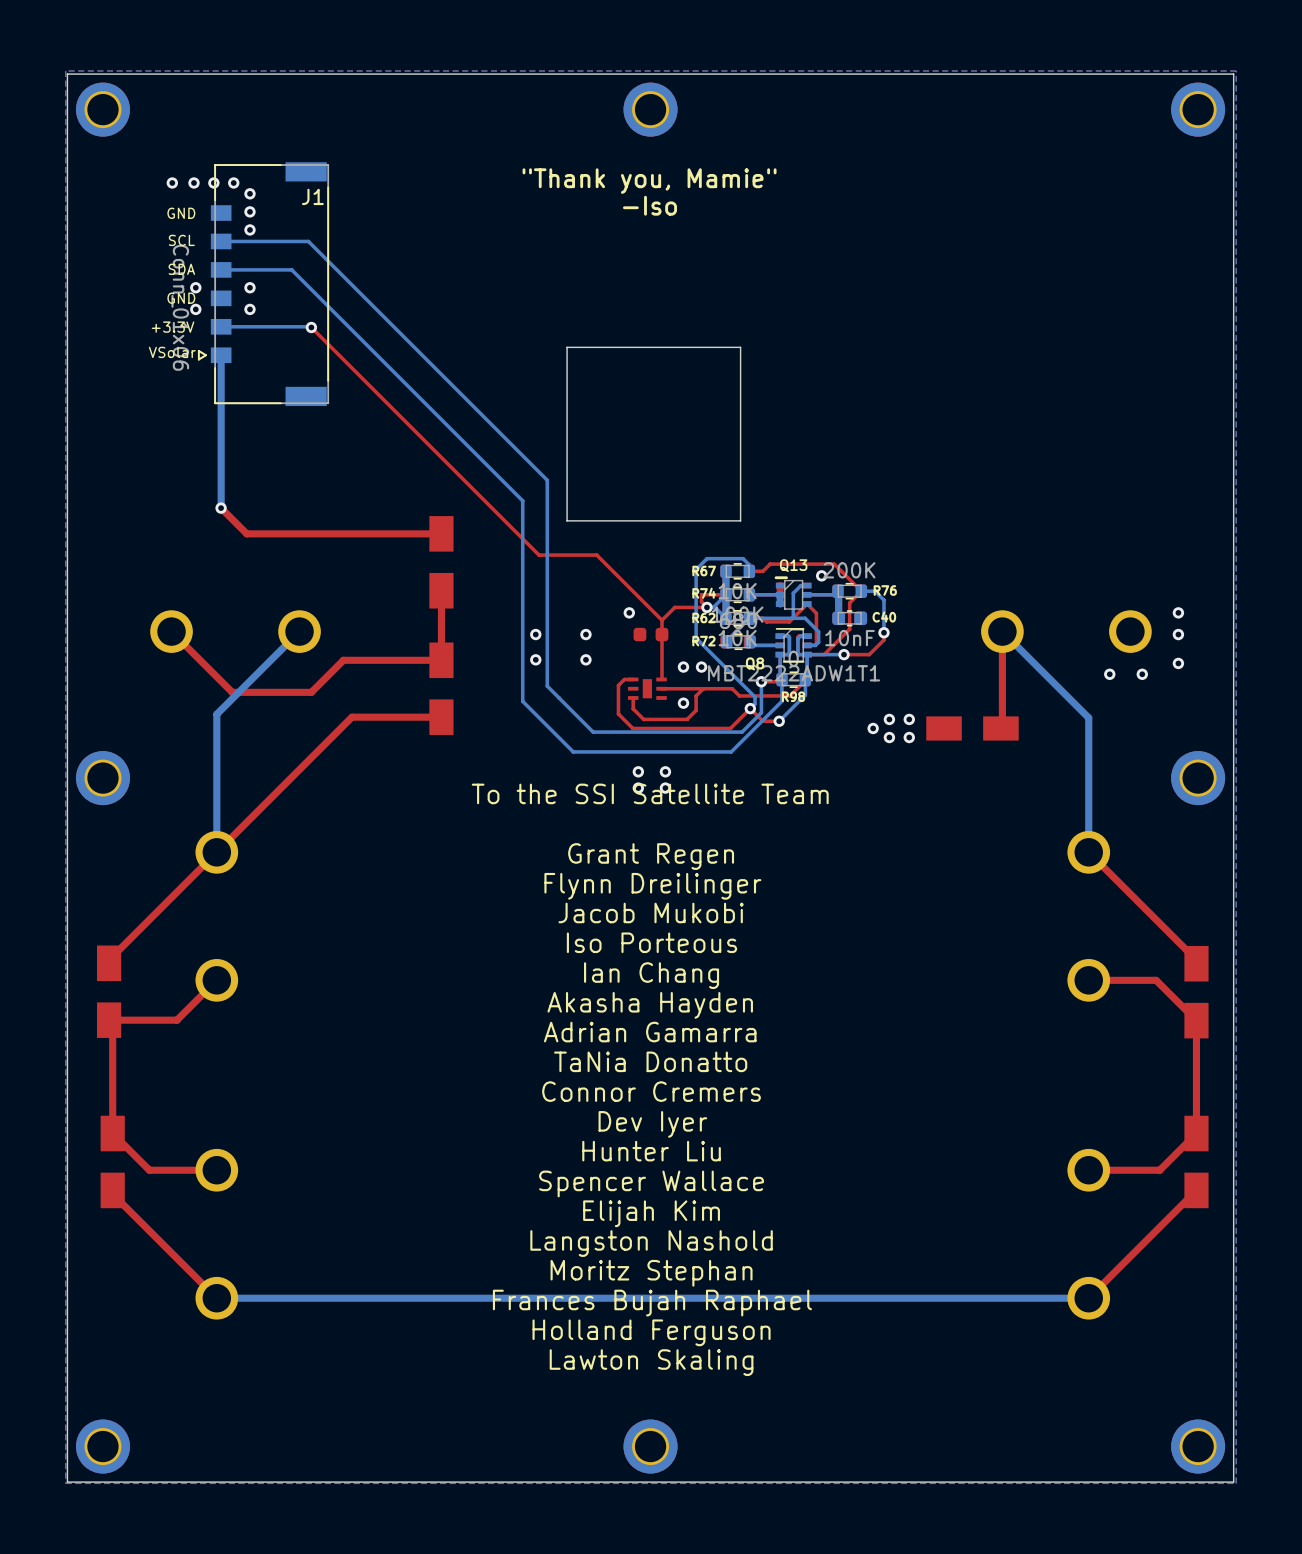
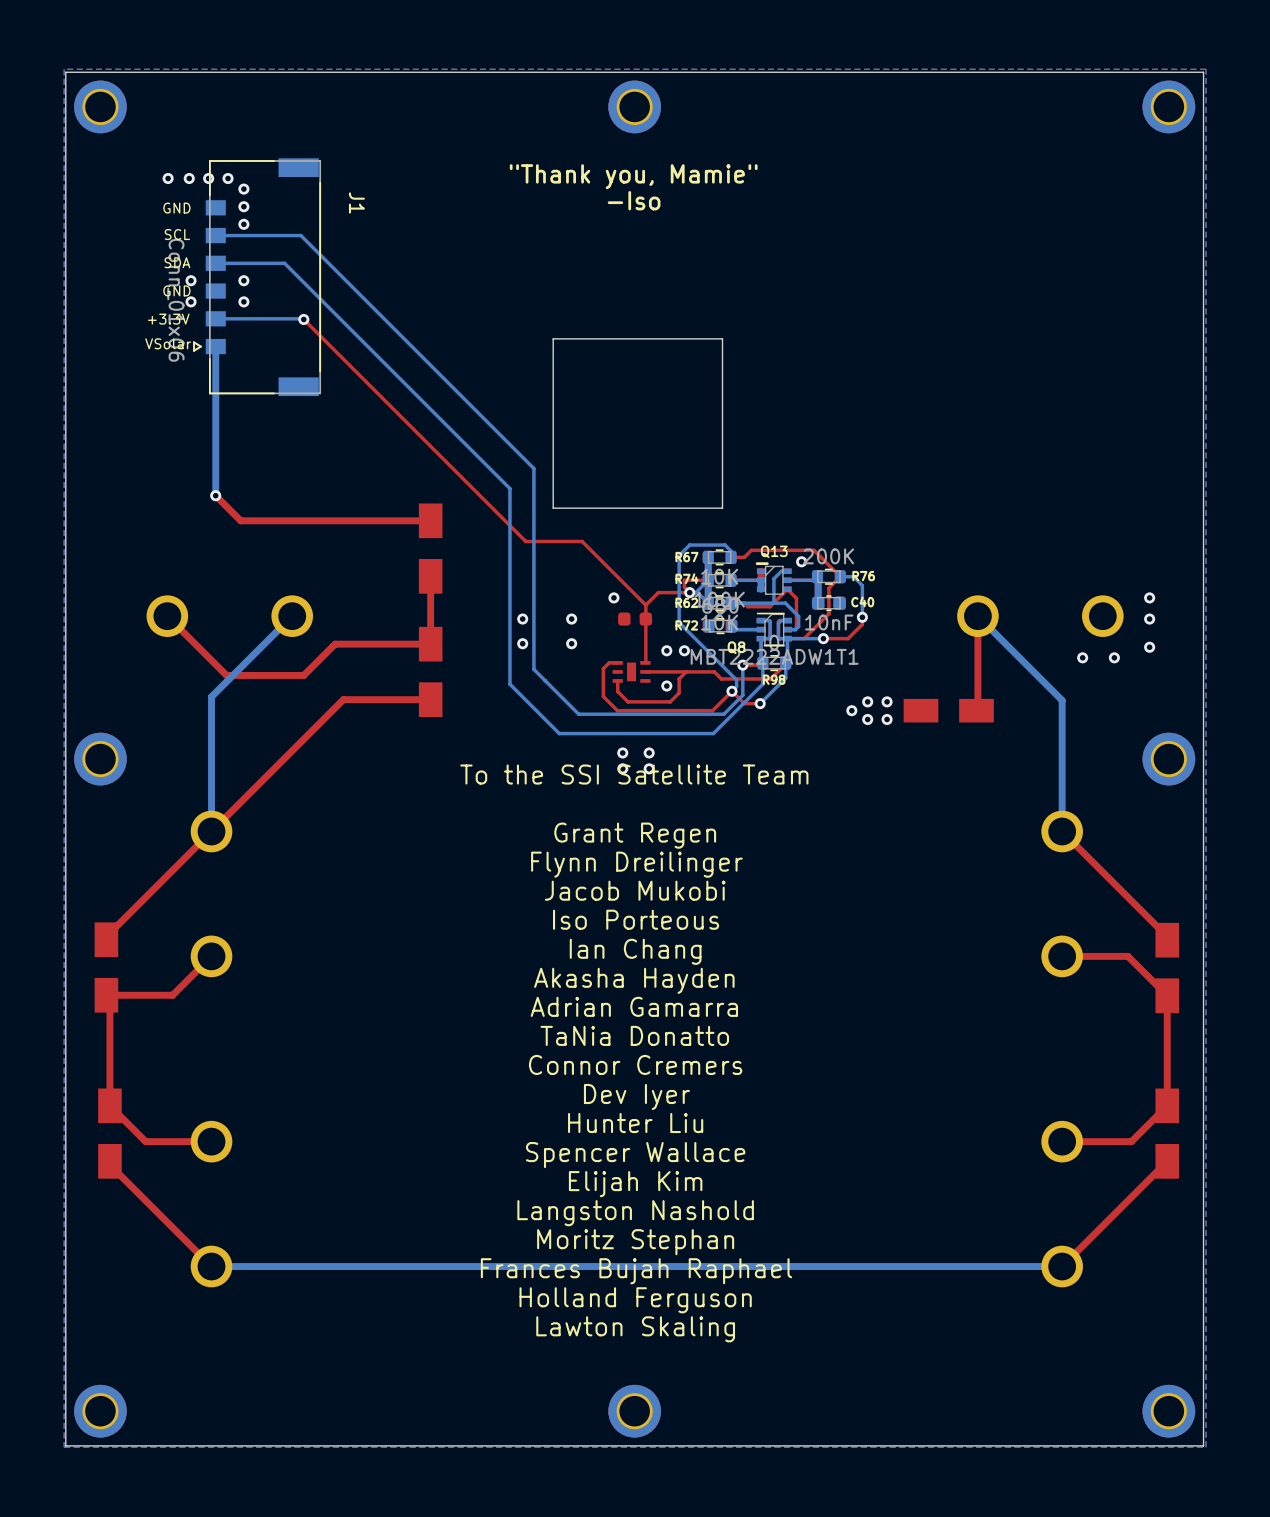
J1 name rotation: 0° (312, 196) -> 90° clockwise (356, 202)
J1 name position: J1 (312, 196) -> J1 (356, 202)

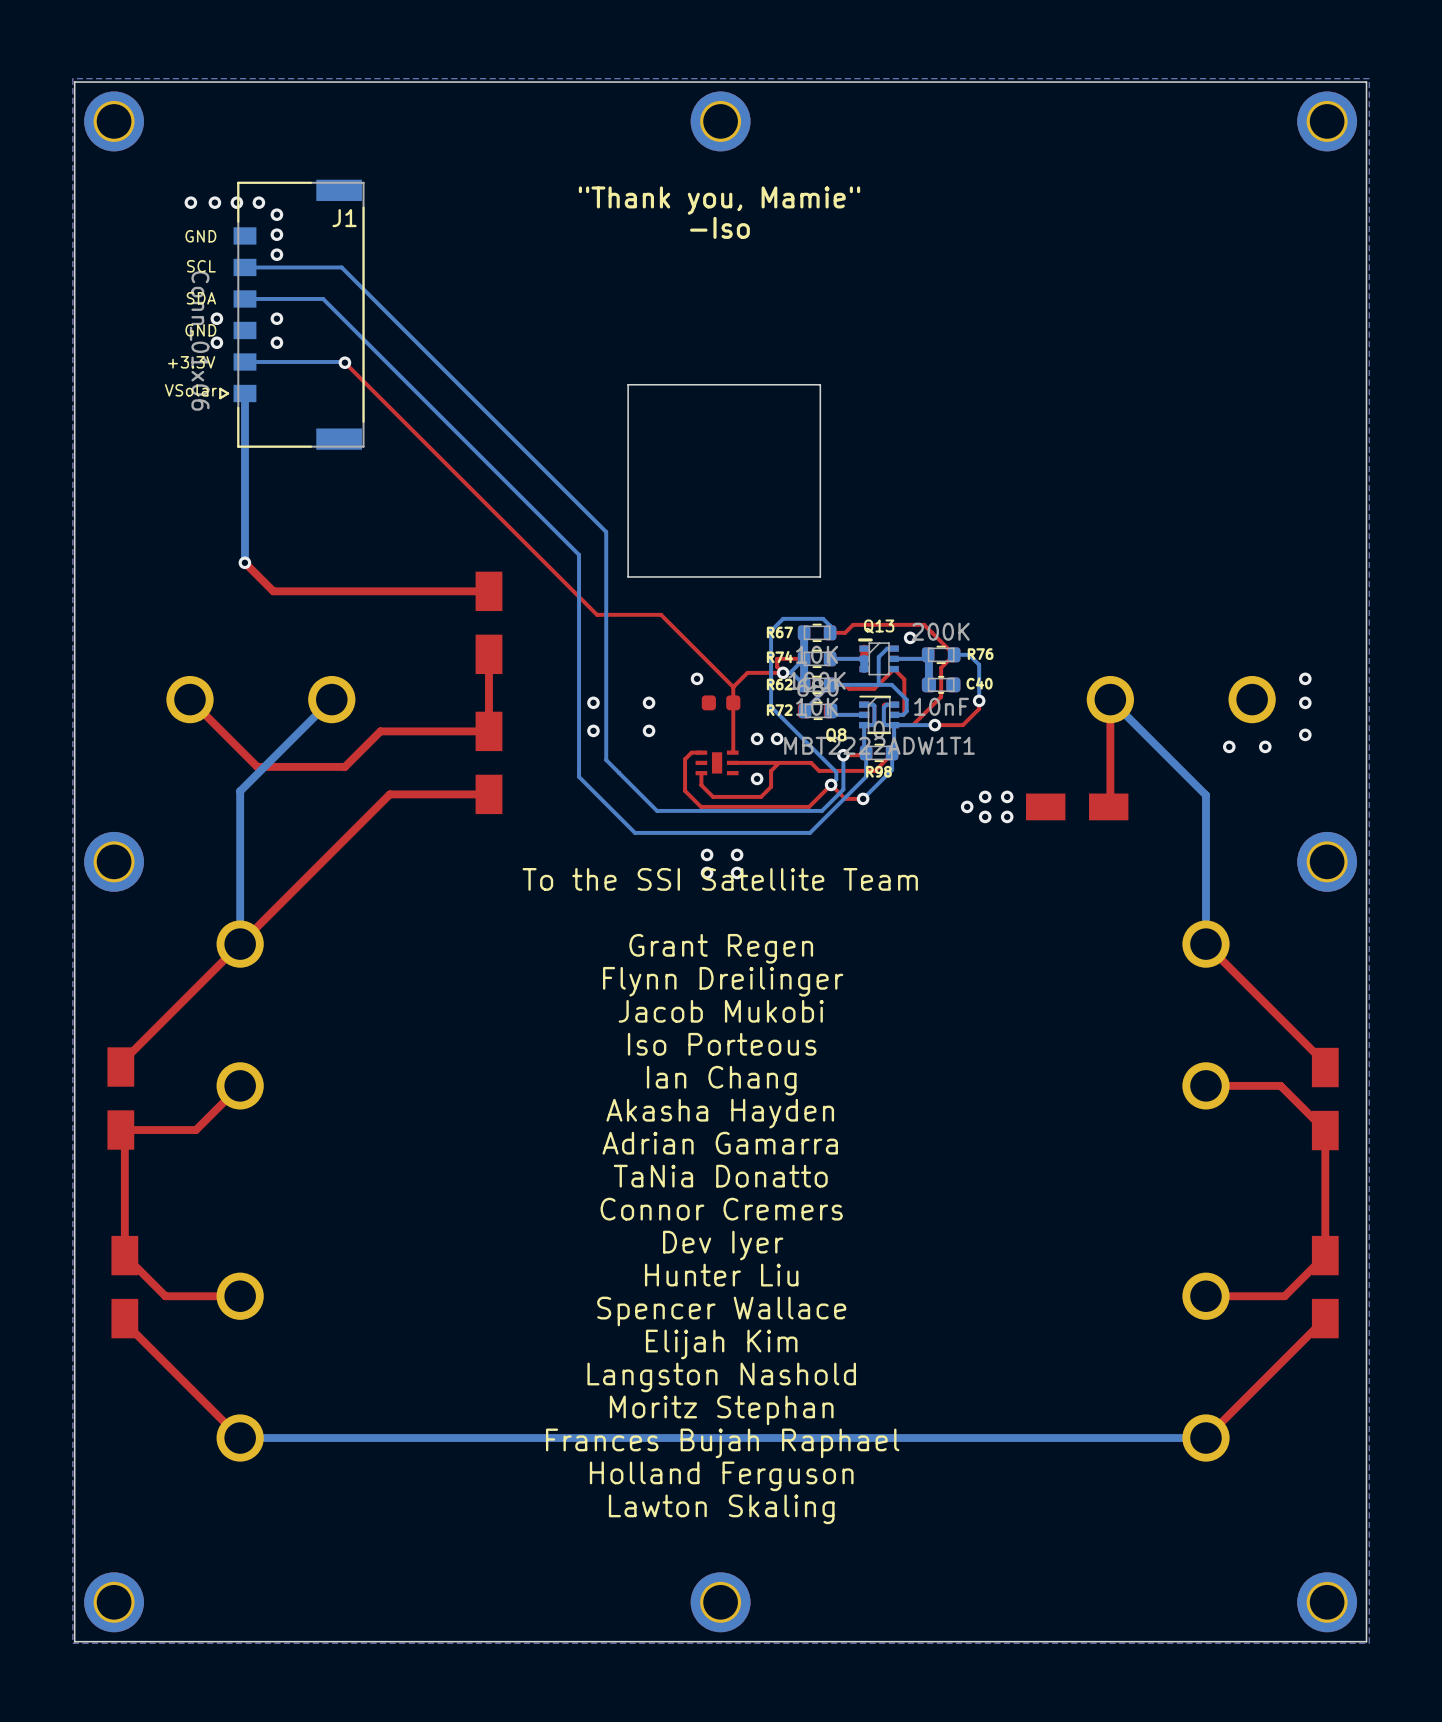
J1 name rotation: 0° (356, 202) -> 90° counterclockwise (344, 218)
J1 name position: J1 (356, 202) -> J1 (344, 218)

